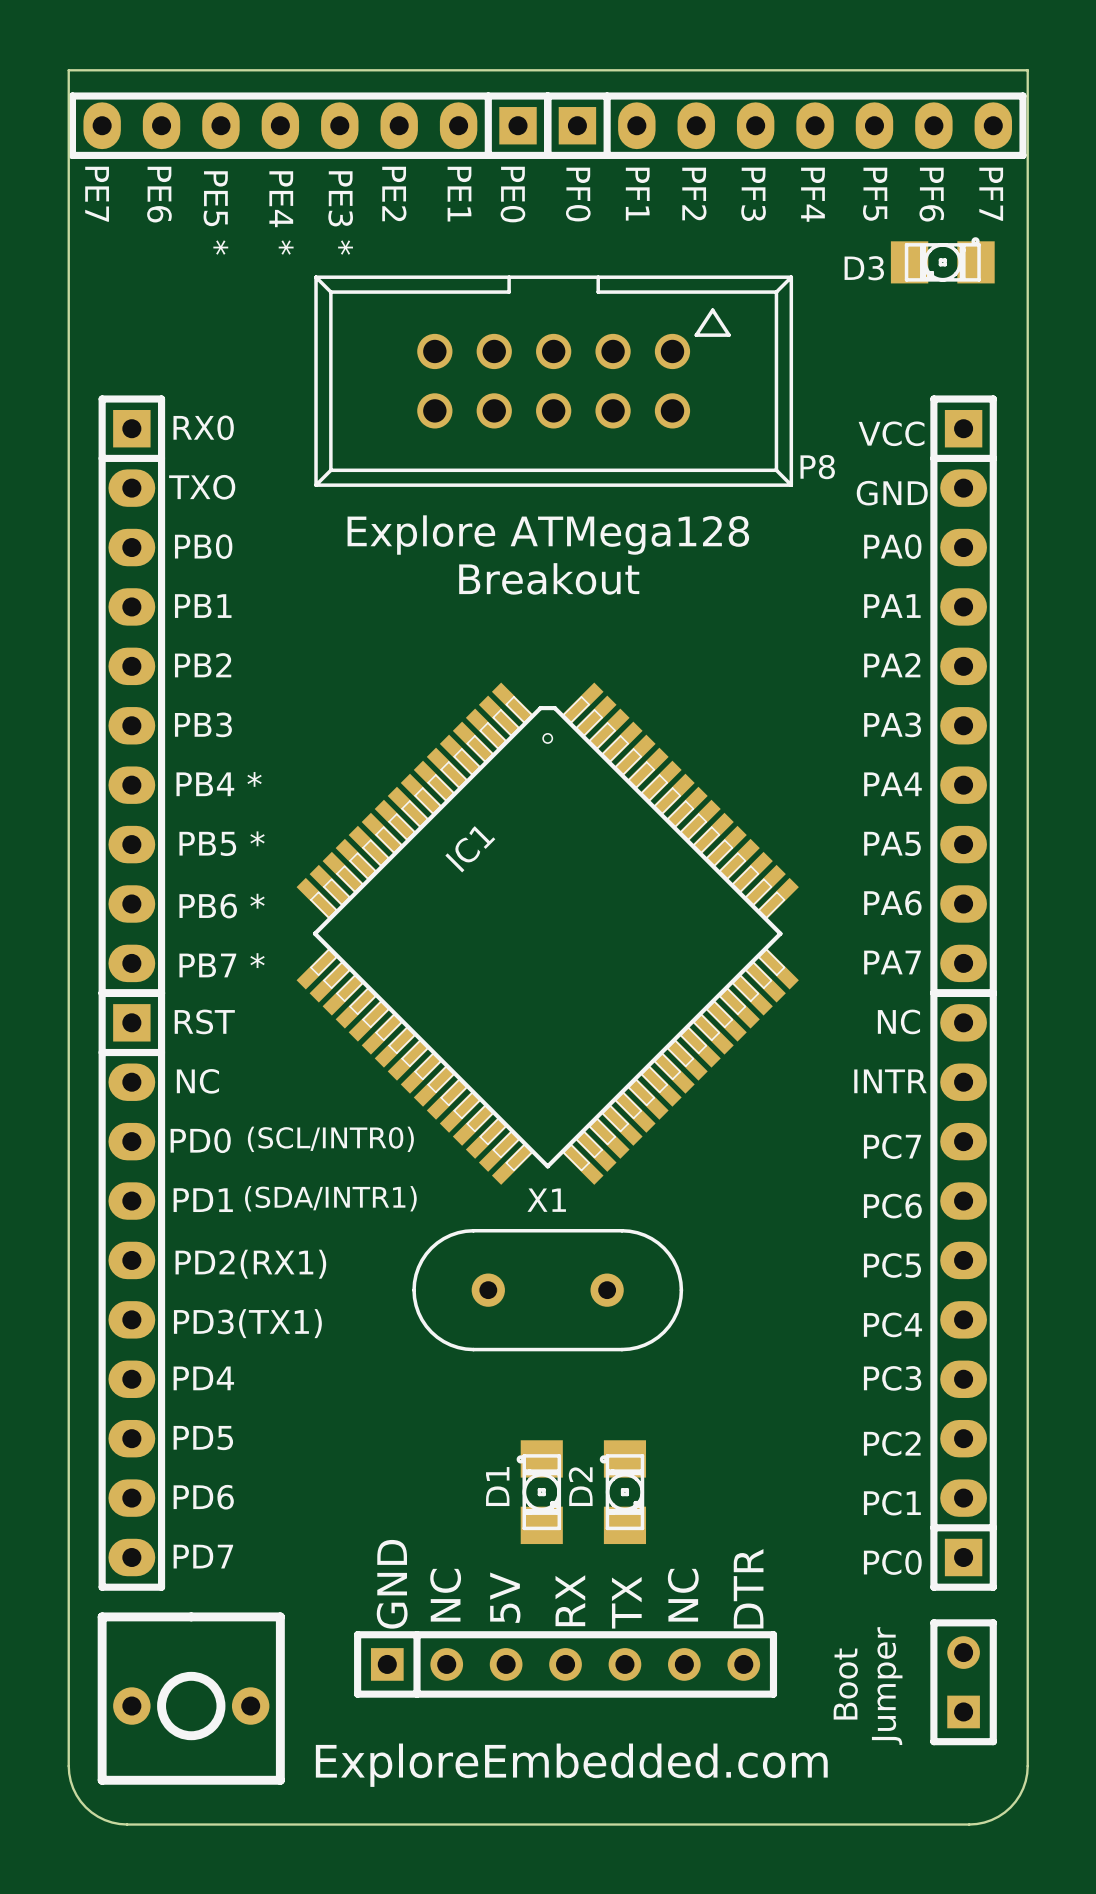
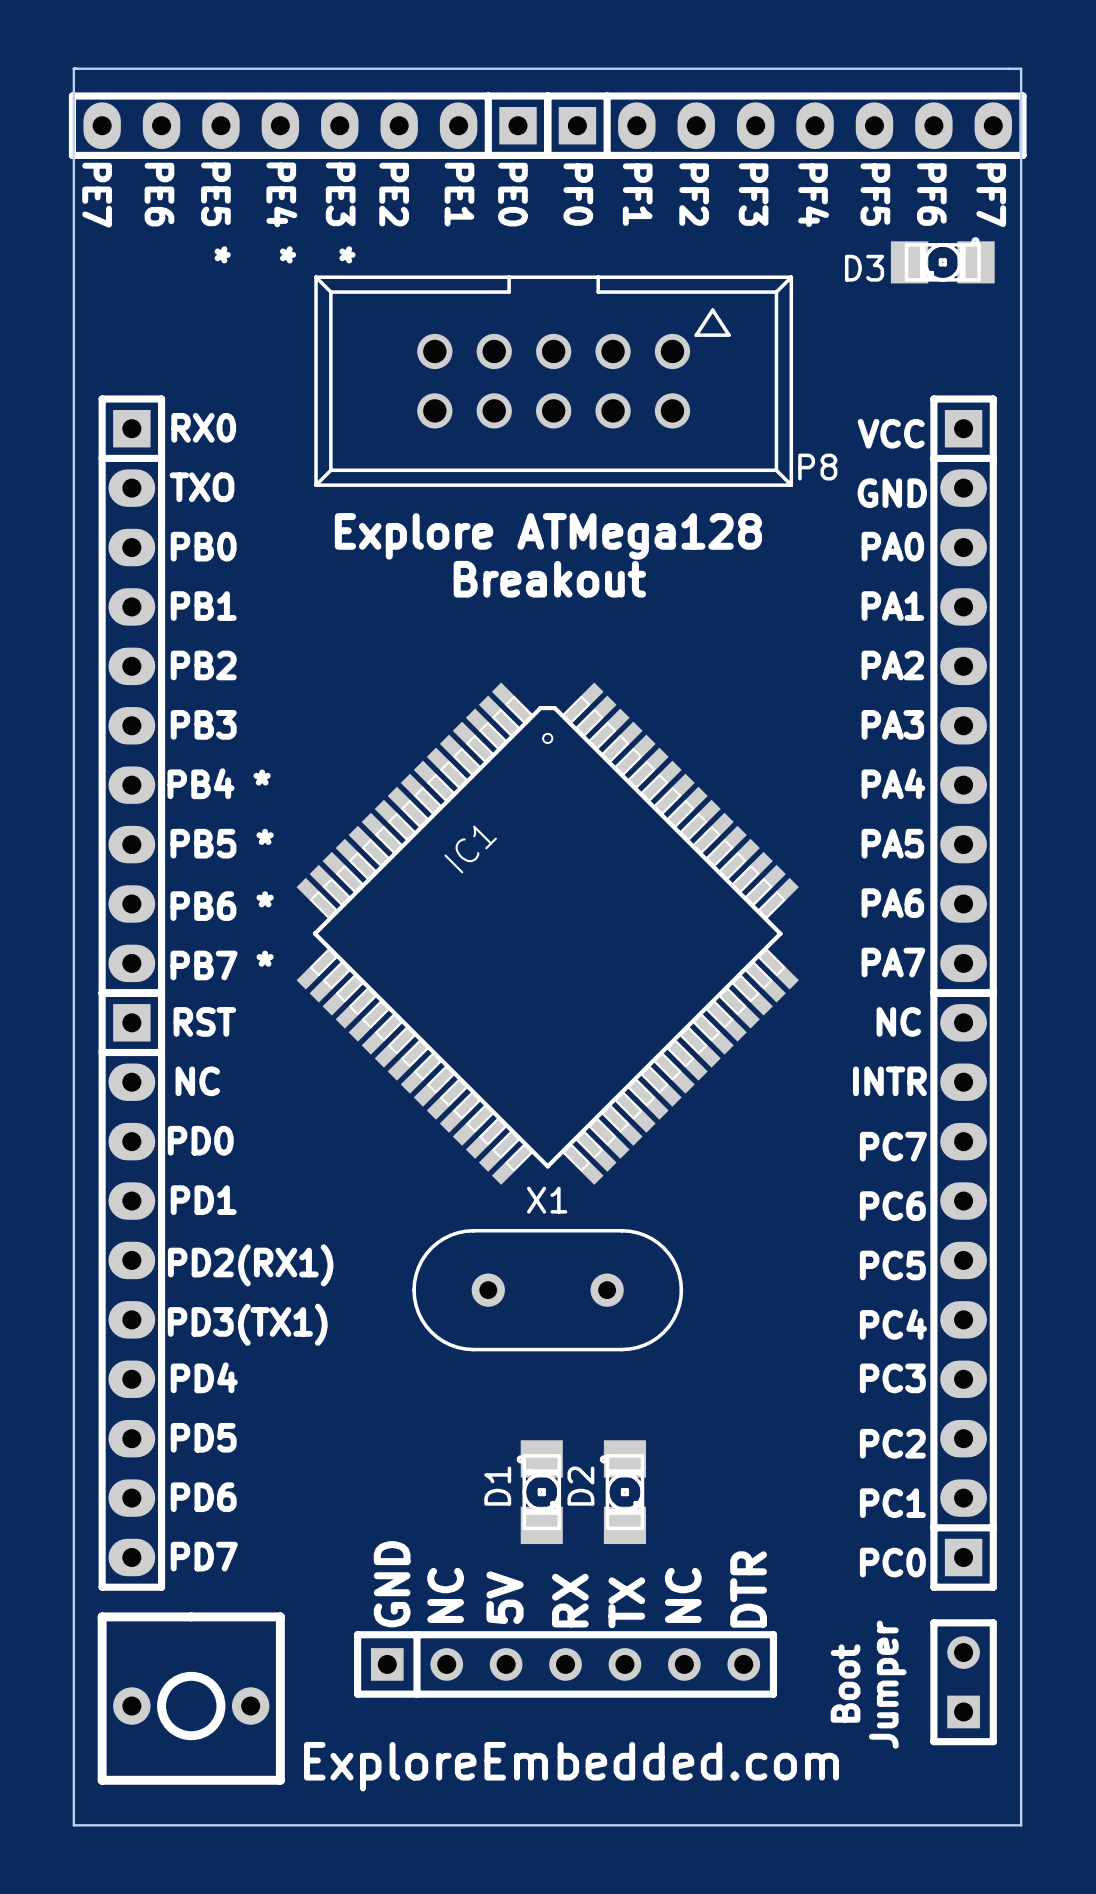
board edge: (68, 70) (68, 1766) (70, 1781) (76, 1795) (85, 1807) (97, 1816) (112, 1822) (127, 1824) (969, 1824) (984, 1822) (998, 1816) (1010, 1807) (1019, 1795) (1025, 1781) (1027, 1766) (1027, 70) (68, 70) -> (73, 68) (73, 1825) (1021, 1825) (1021, 68) (73, 68)
text: (SCL/INTR0) (330, 1139) -> none
text: (SDA/INTR1) (330, 1198) -> none

